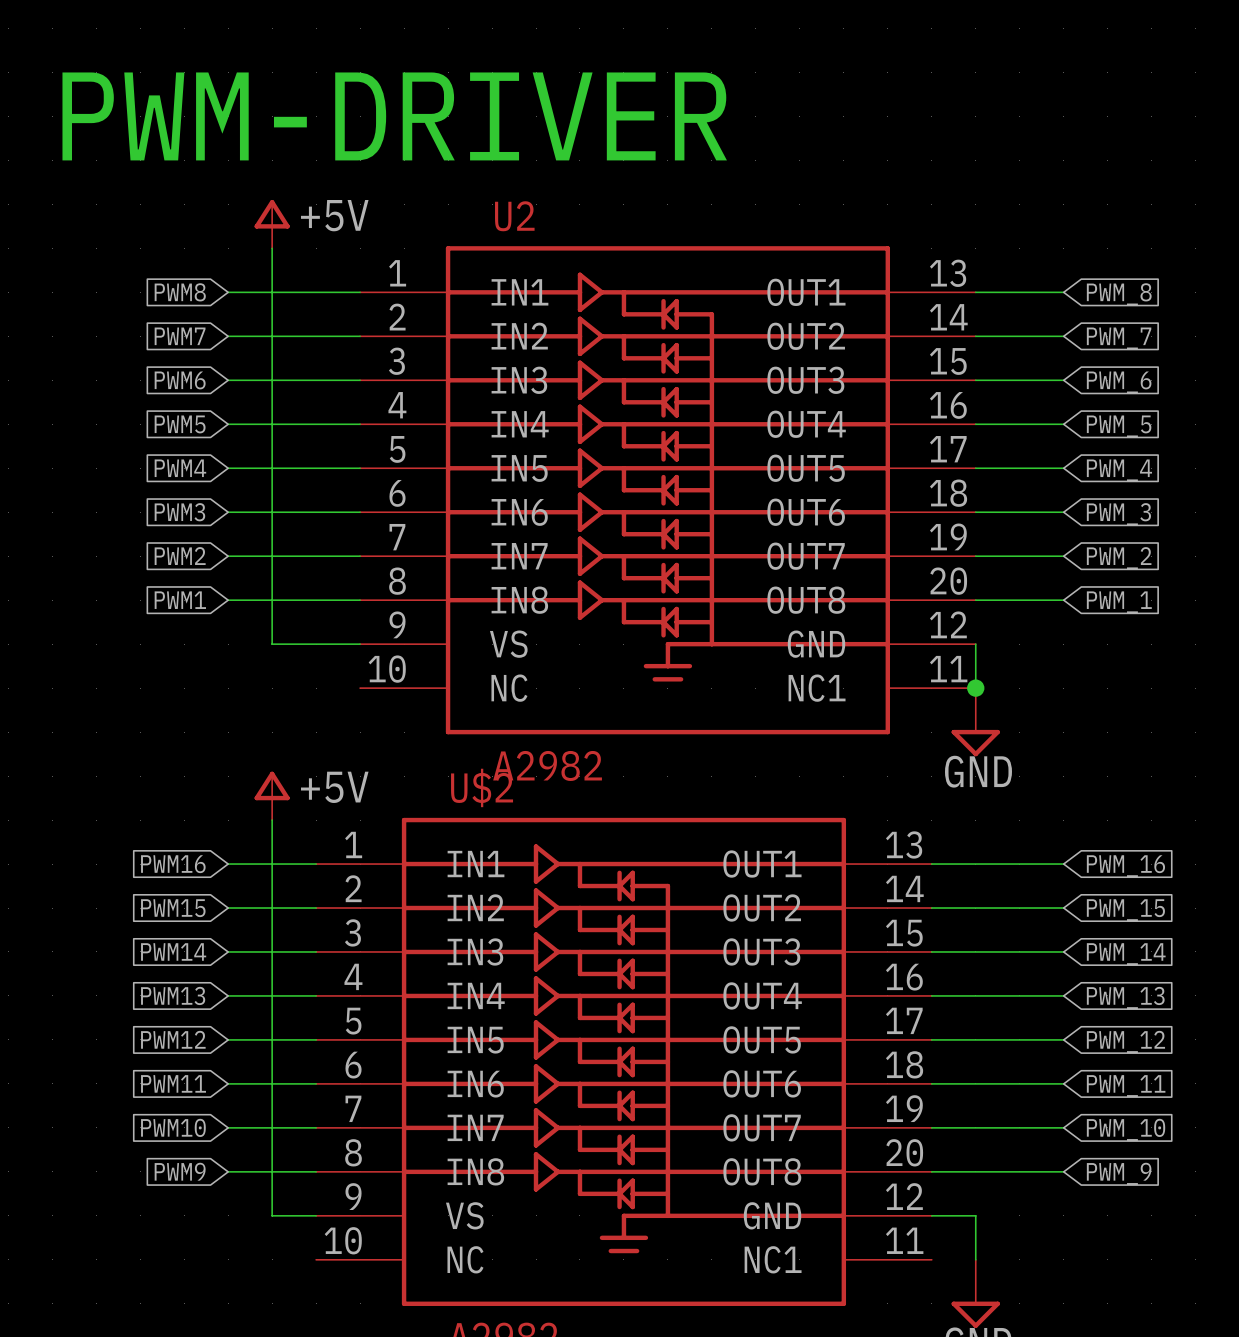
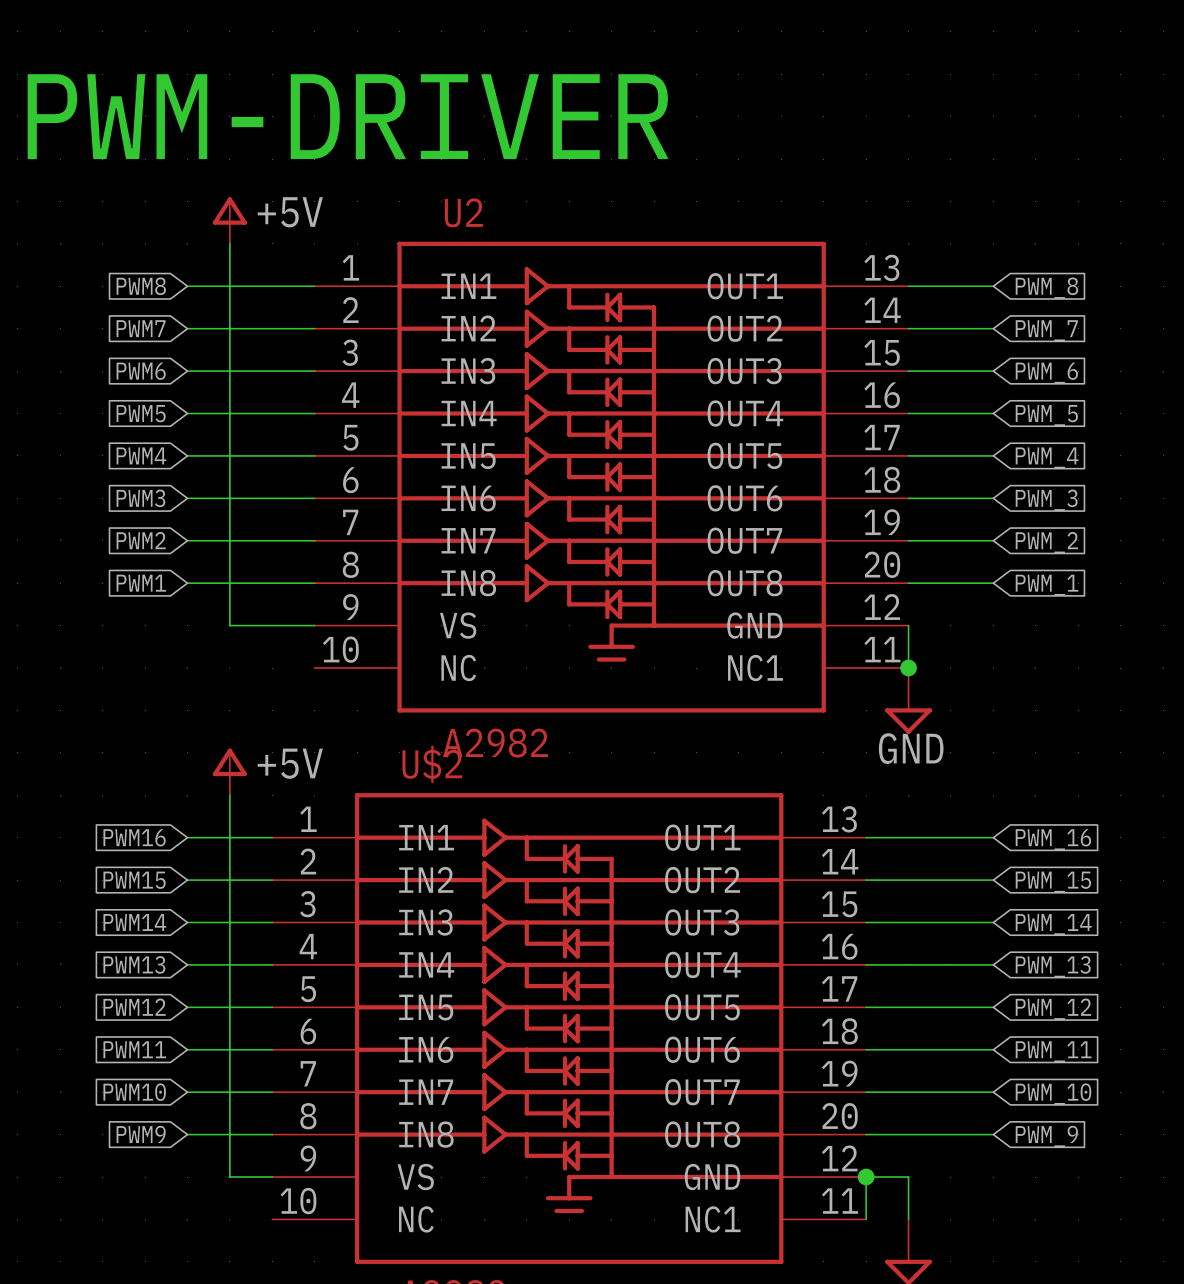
wire: none -> (866, 1177) (866, 1219)
junction: none -> (866, 1177)

